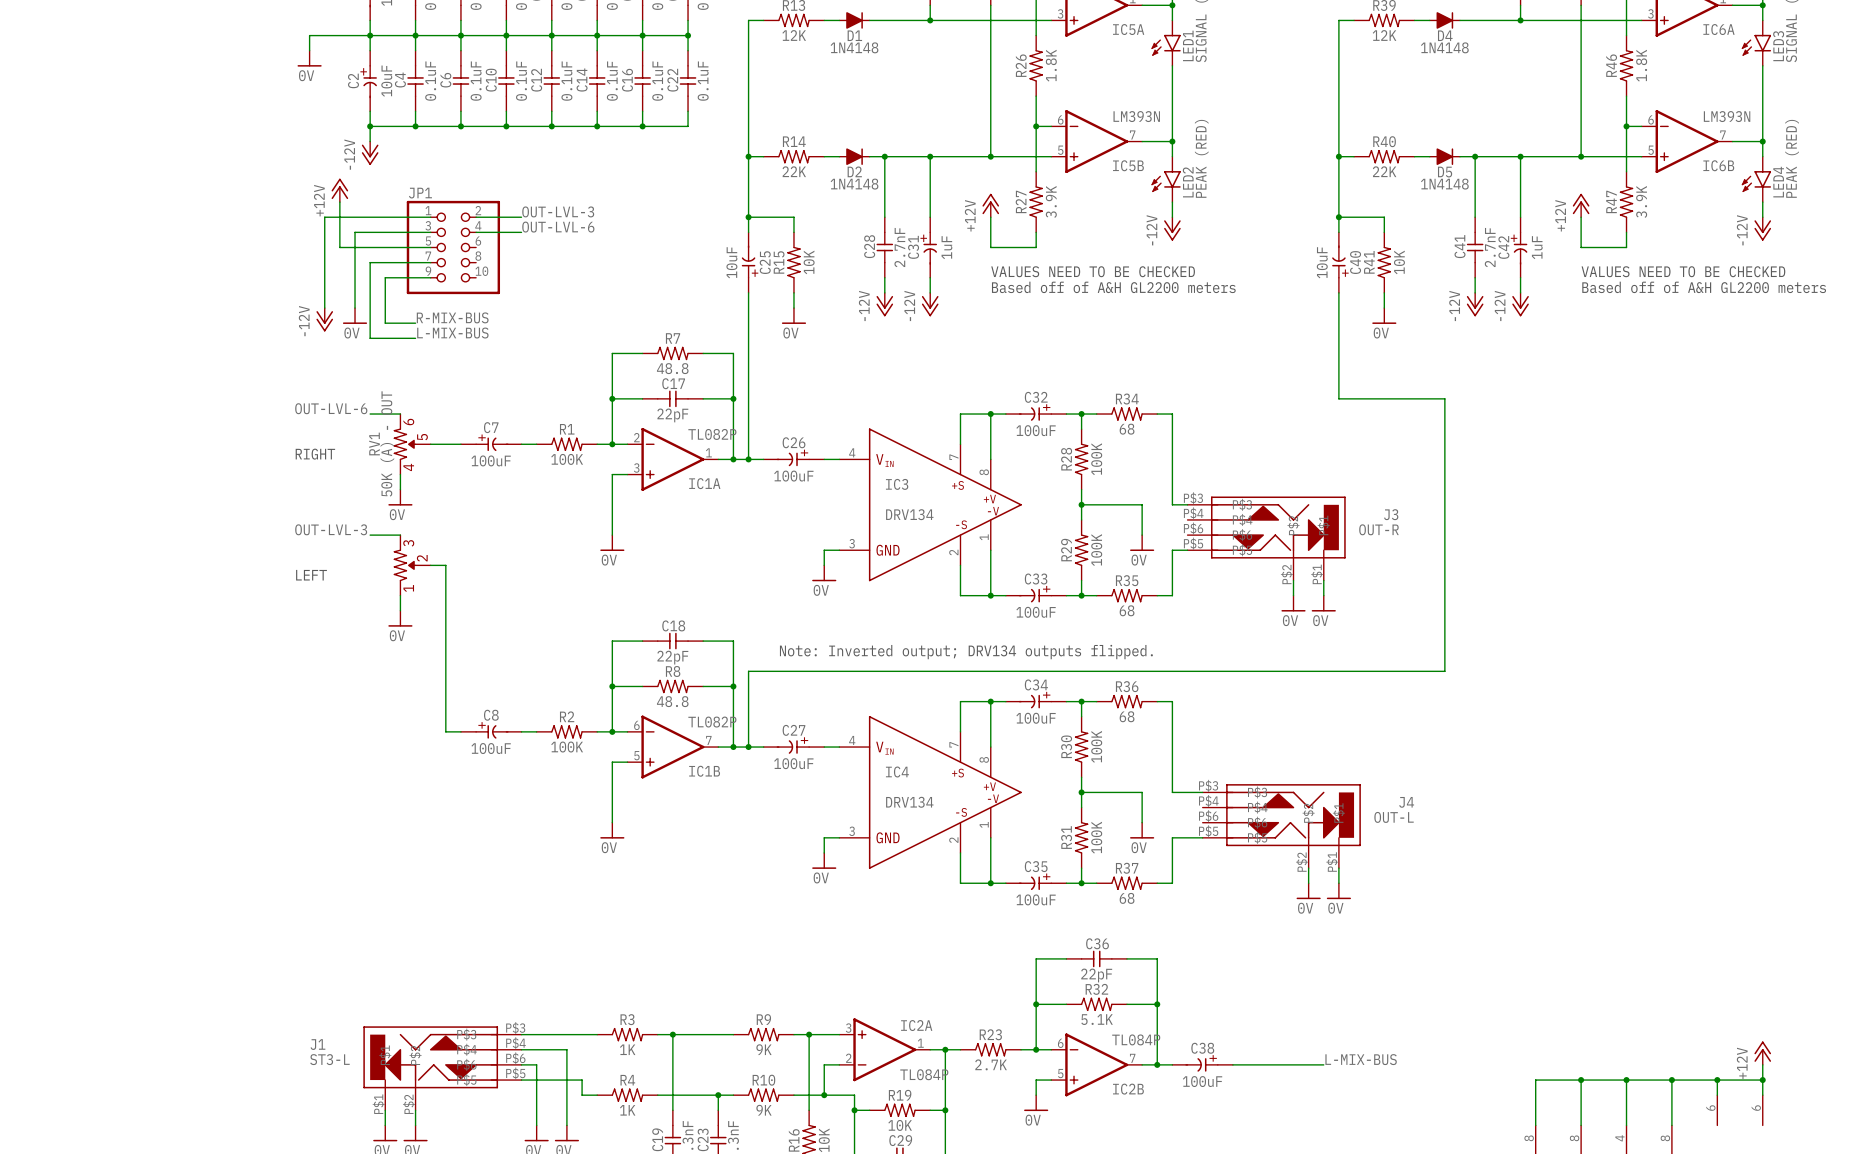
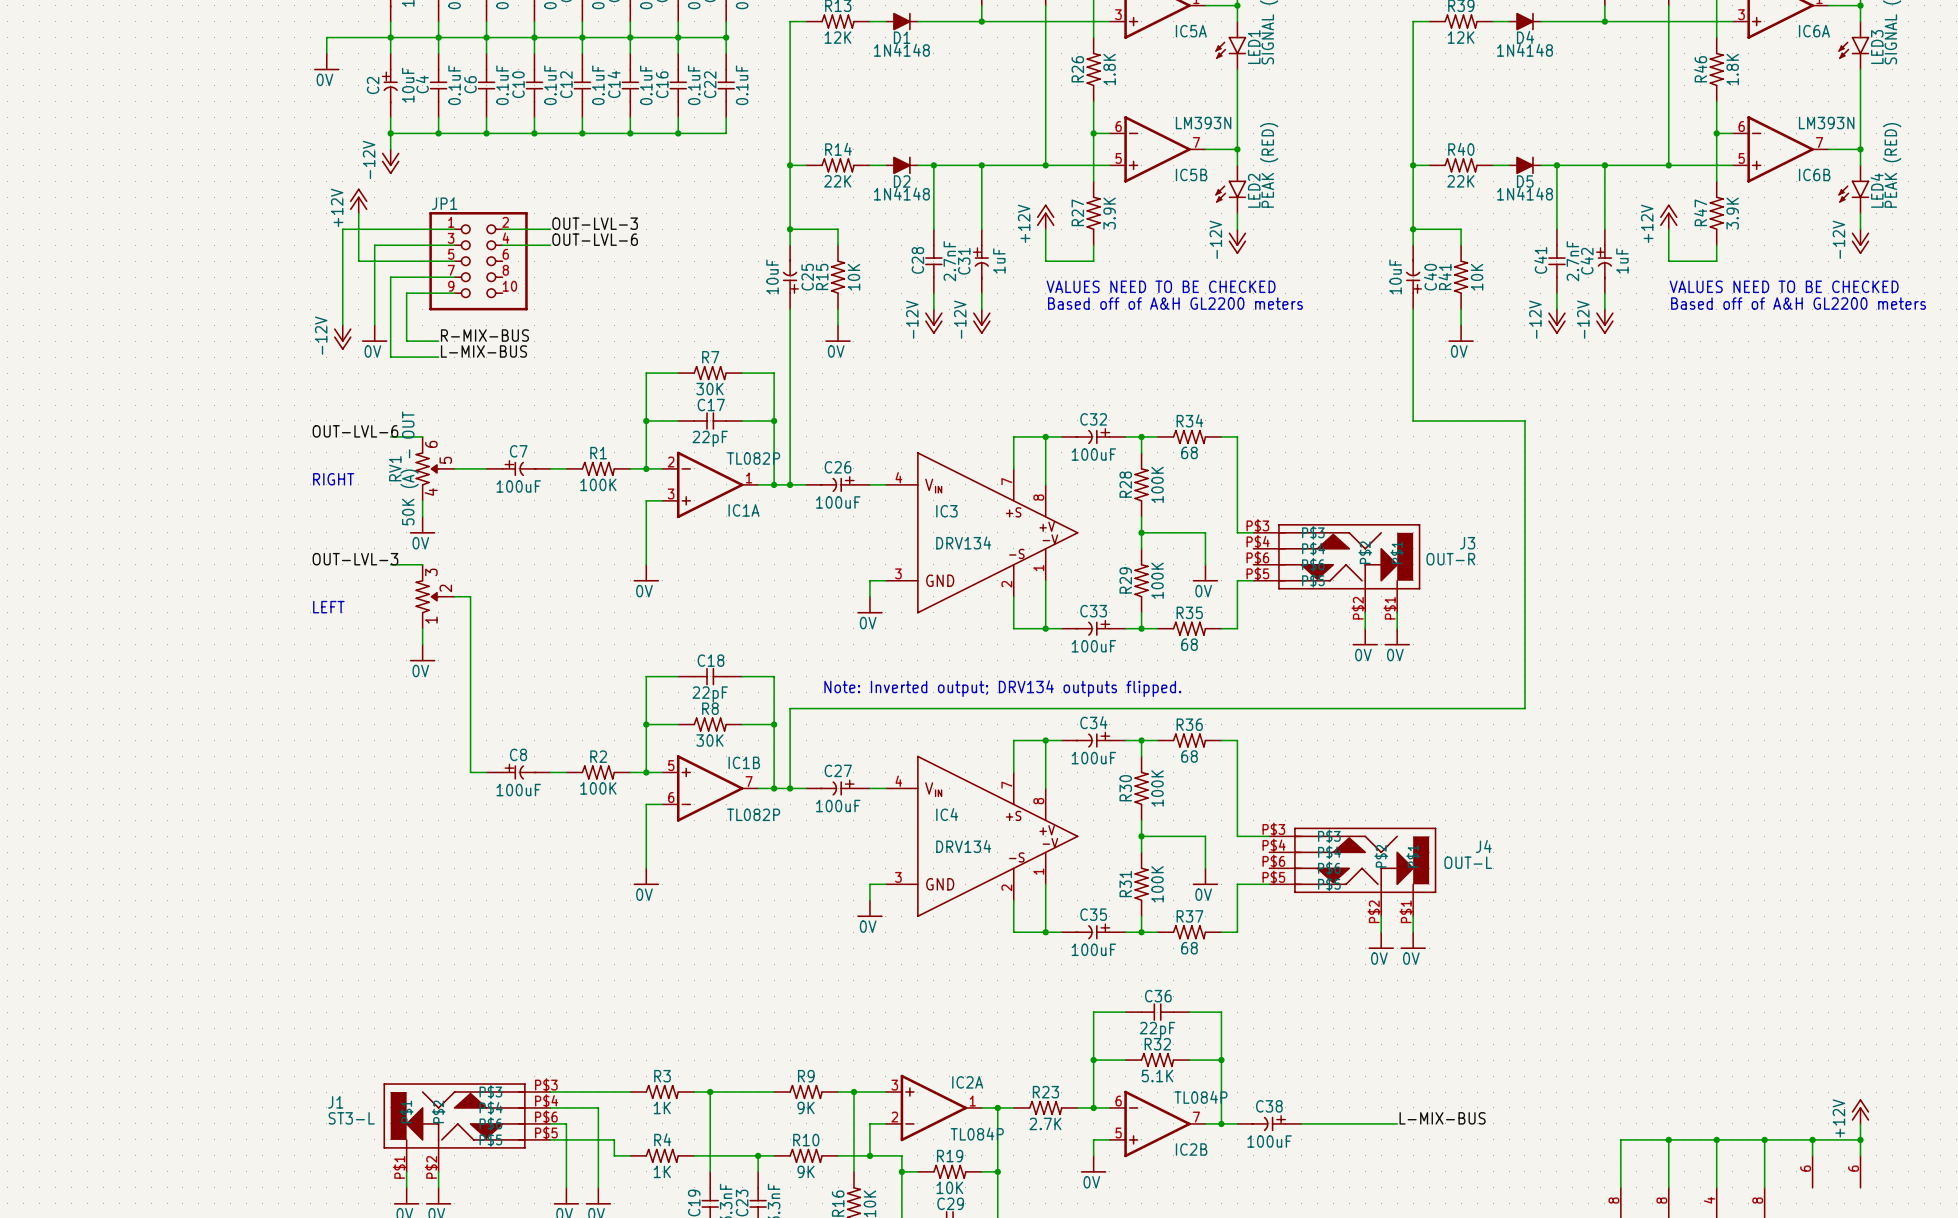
R7 value: 48.8 (672, 368) -> 30K (709, 389)
R8 value: 48.8 (672, 701) -> 30K (709, 740)
IC1B flip: as is (672, 747) -> up-down (710, 788)

